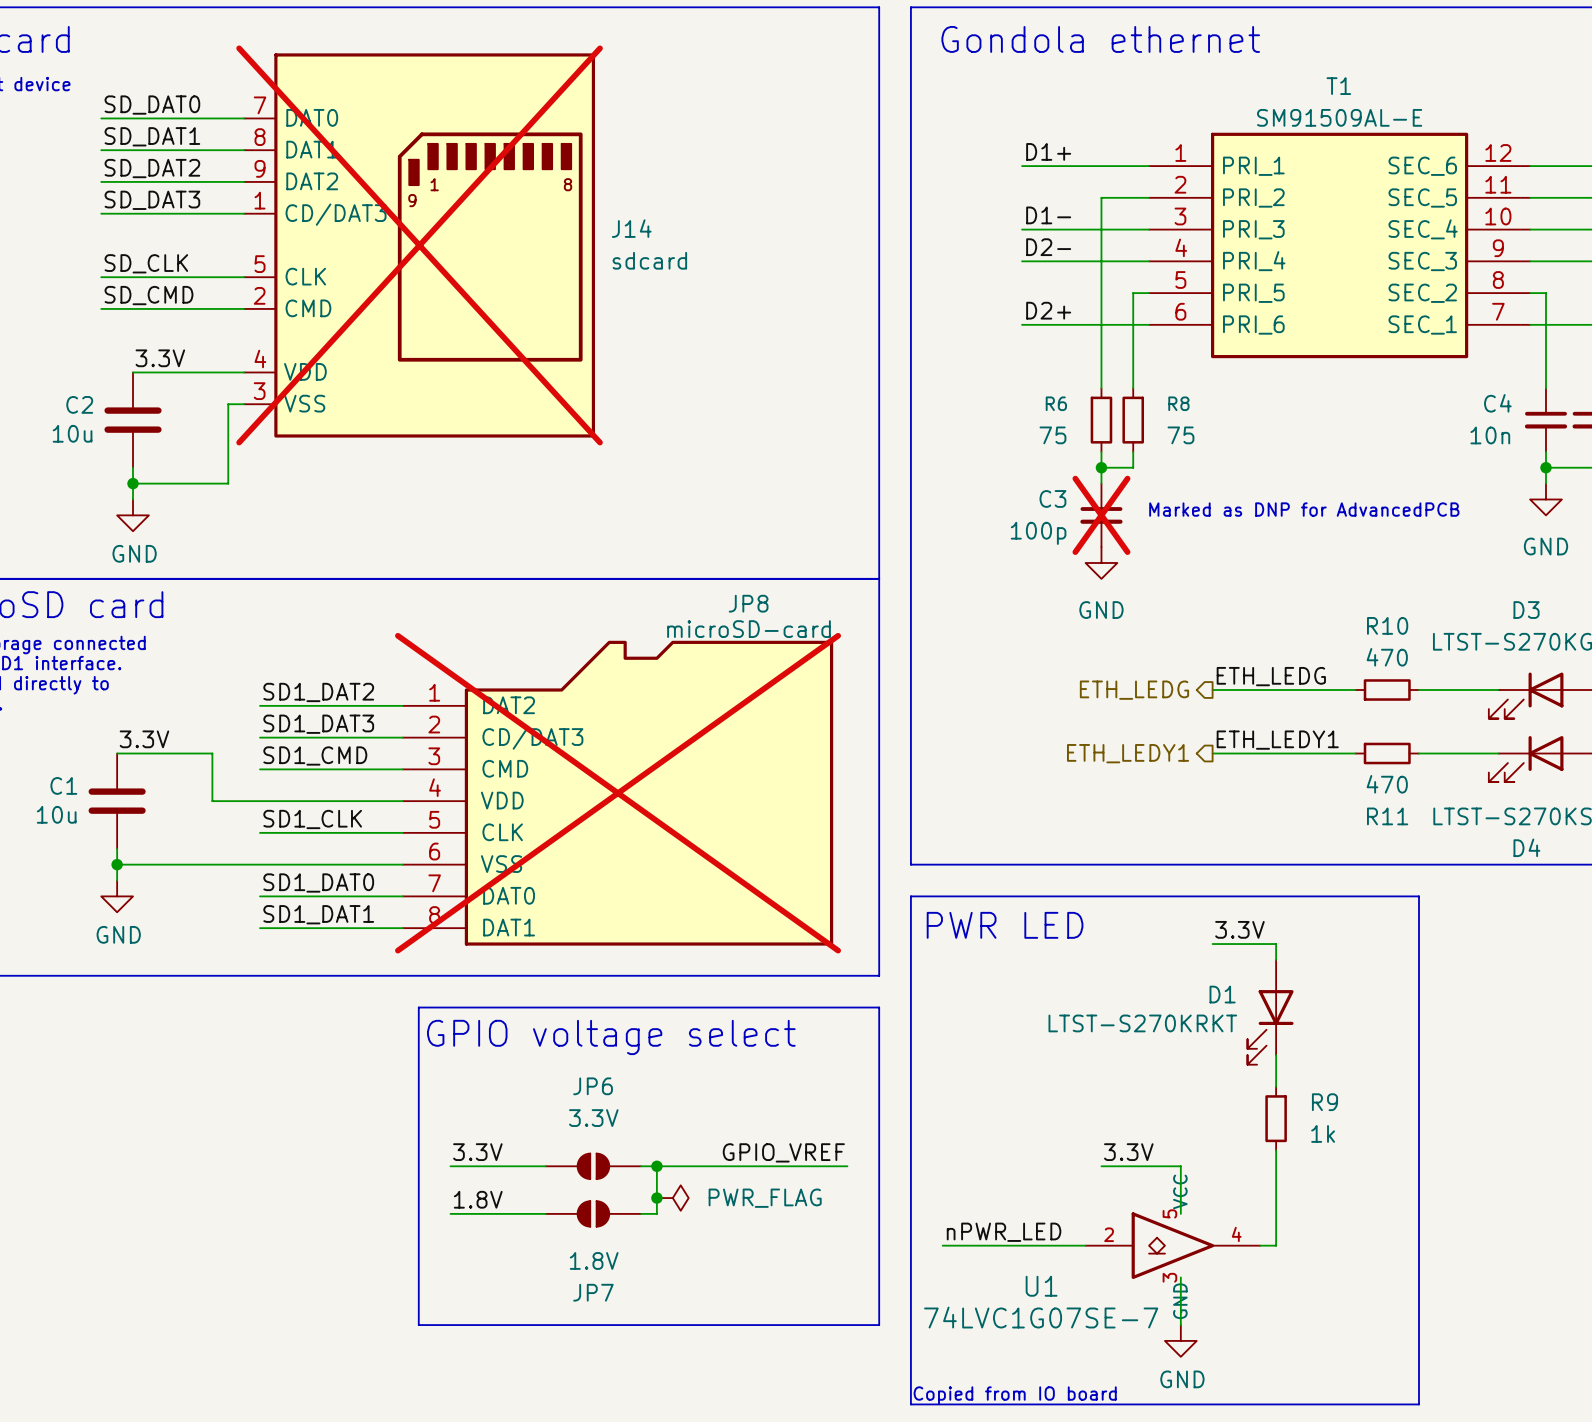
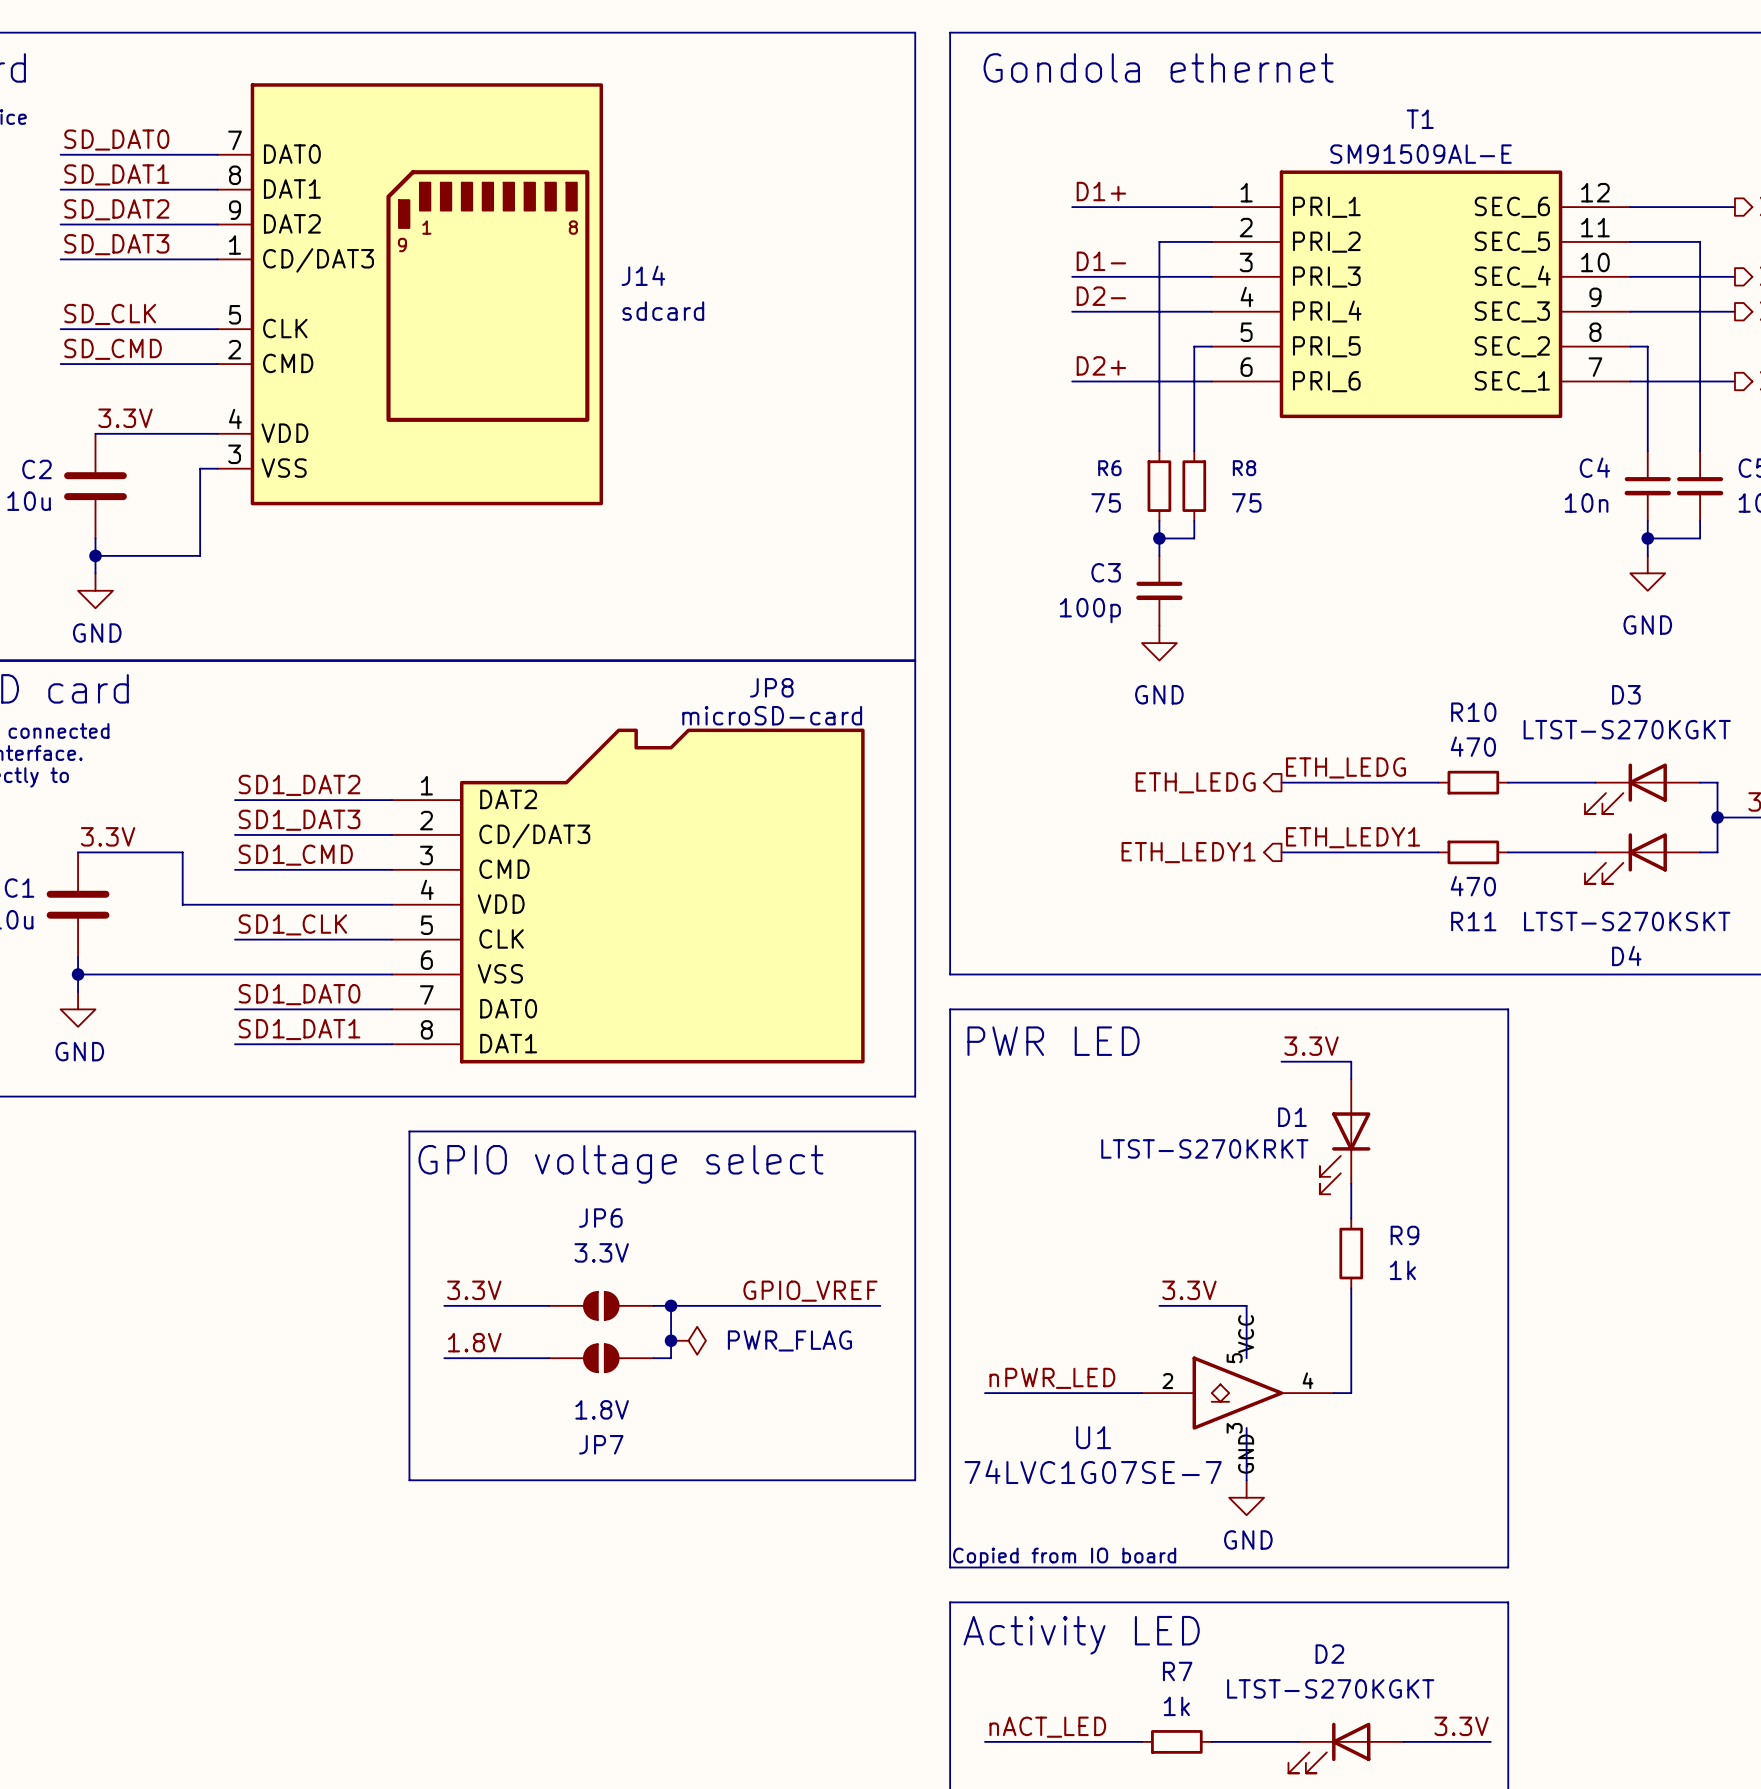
J14 do-not-place cross: (419, 245) -> none
text: Marked as DNP for AdvancedPCB (1304, 509) -> none
C3 do-not-place cross: (1101, 515) -> none
JP8 do-not-place cross: (618, 793) -> none

